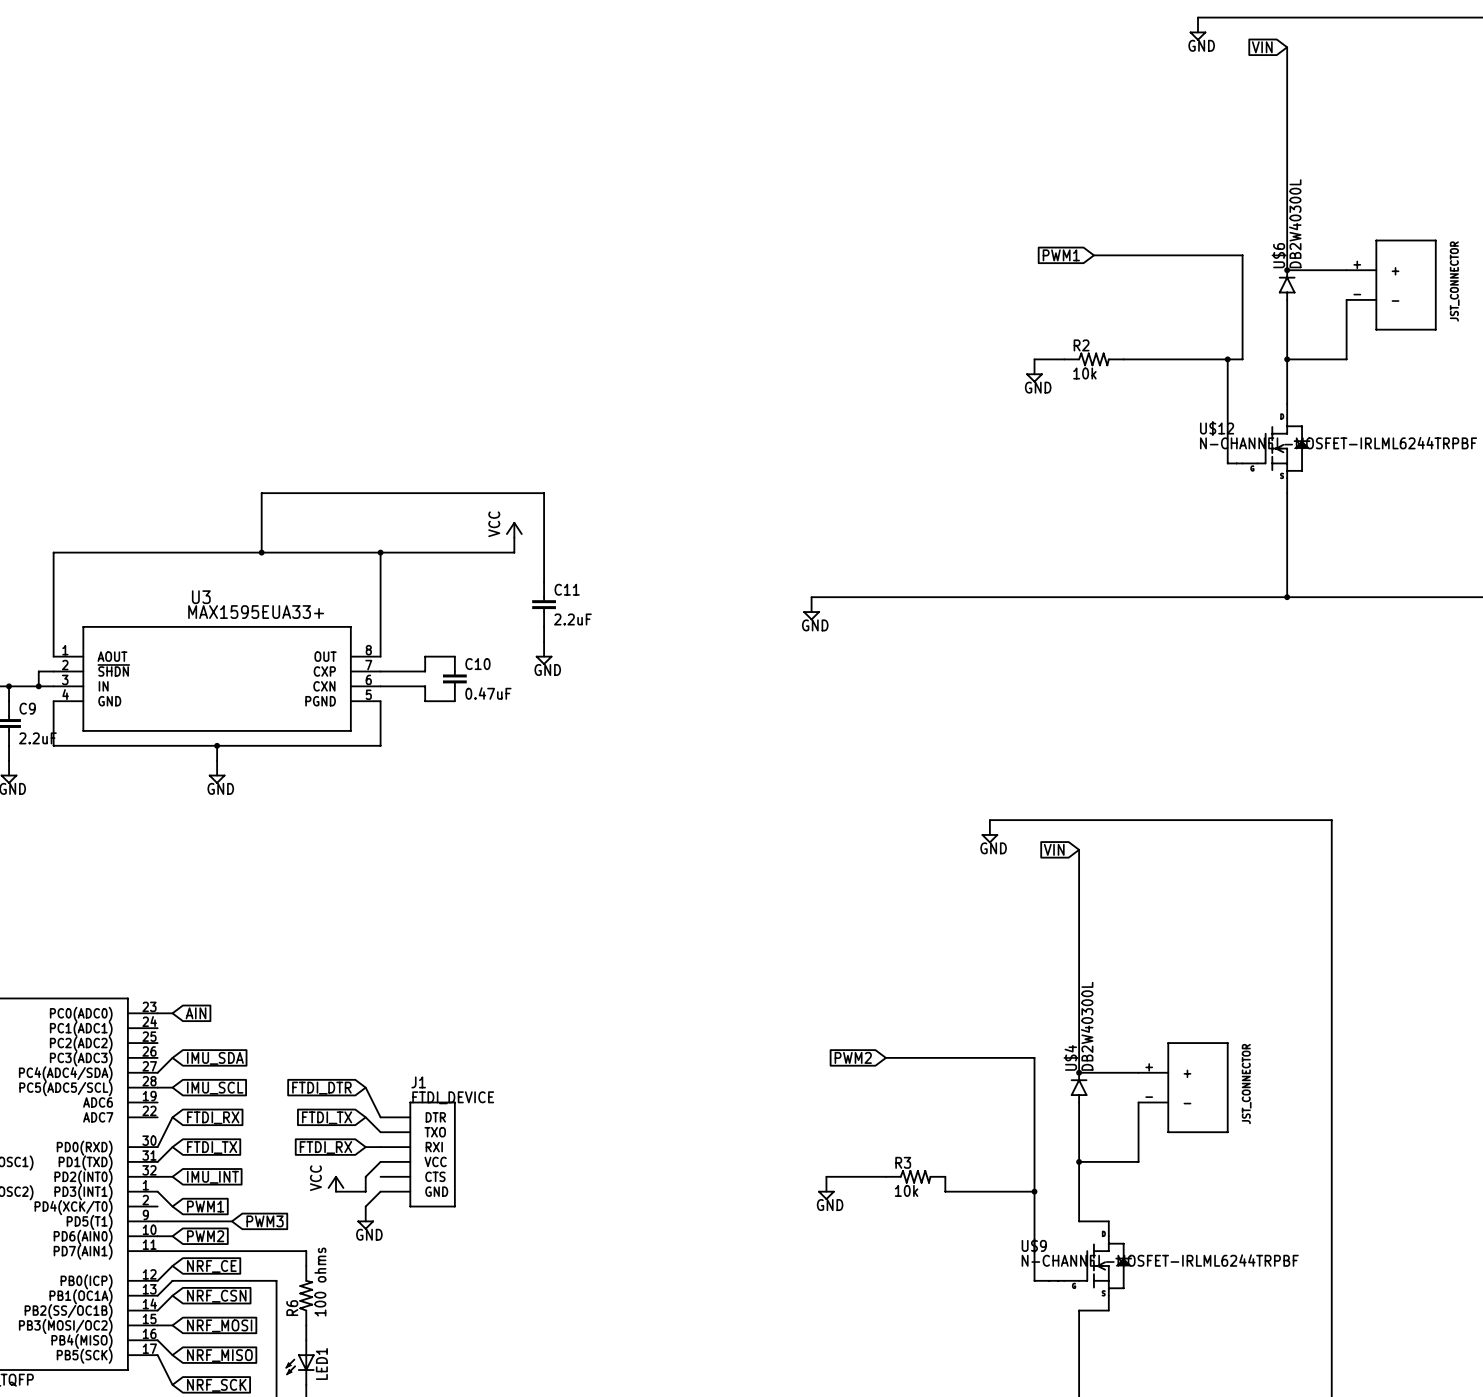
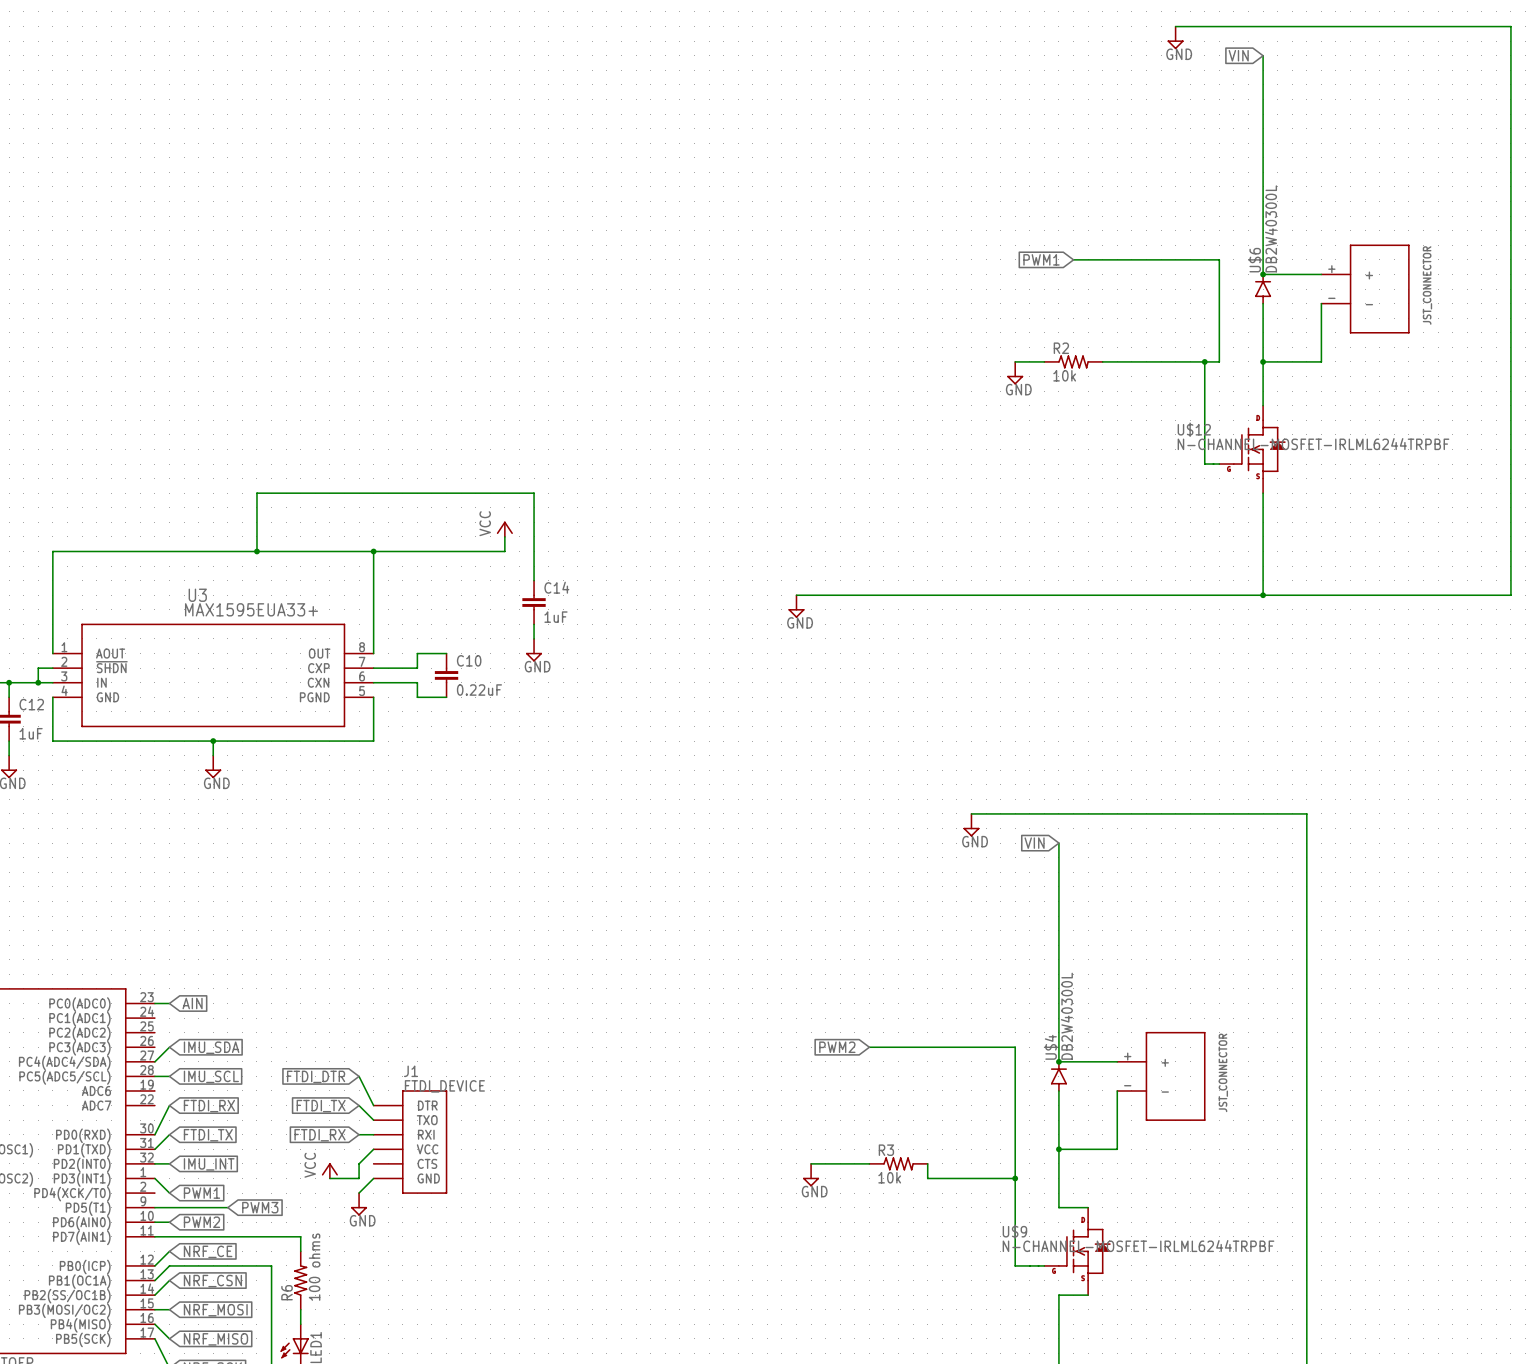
C11 name: C11 (567, 589) -> C14 (556, 587)
C11 value: 2.2uF (572, 619) -> 1uF (556, 617)
C10 value: 0.47uF (488, 693) -> 0.22uF (479, 690)
C9 name: C9 (27, 708) -> C12 (31, 704)
C9 value: 2.2uF (37, 738) -> 1uF (31, 733)

